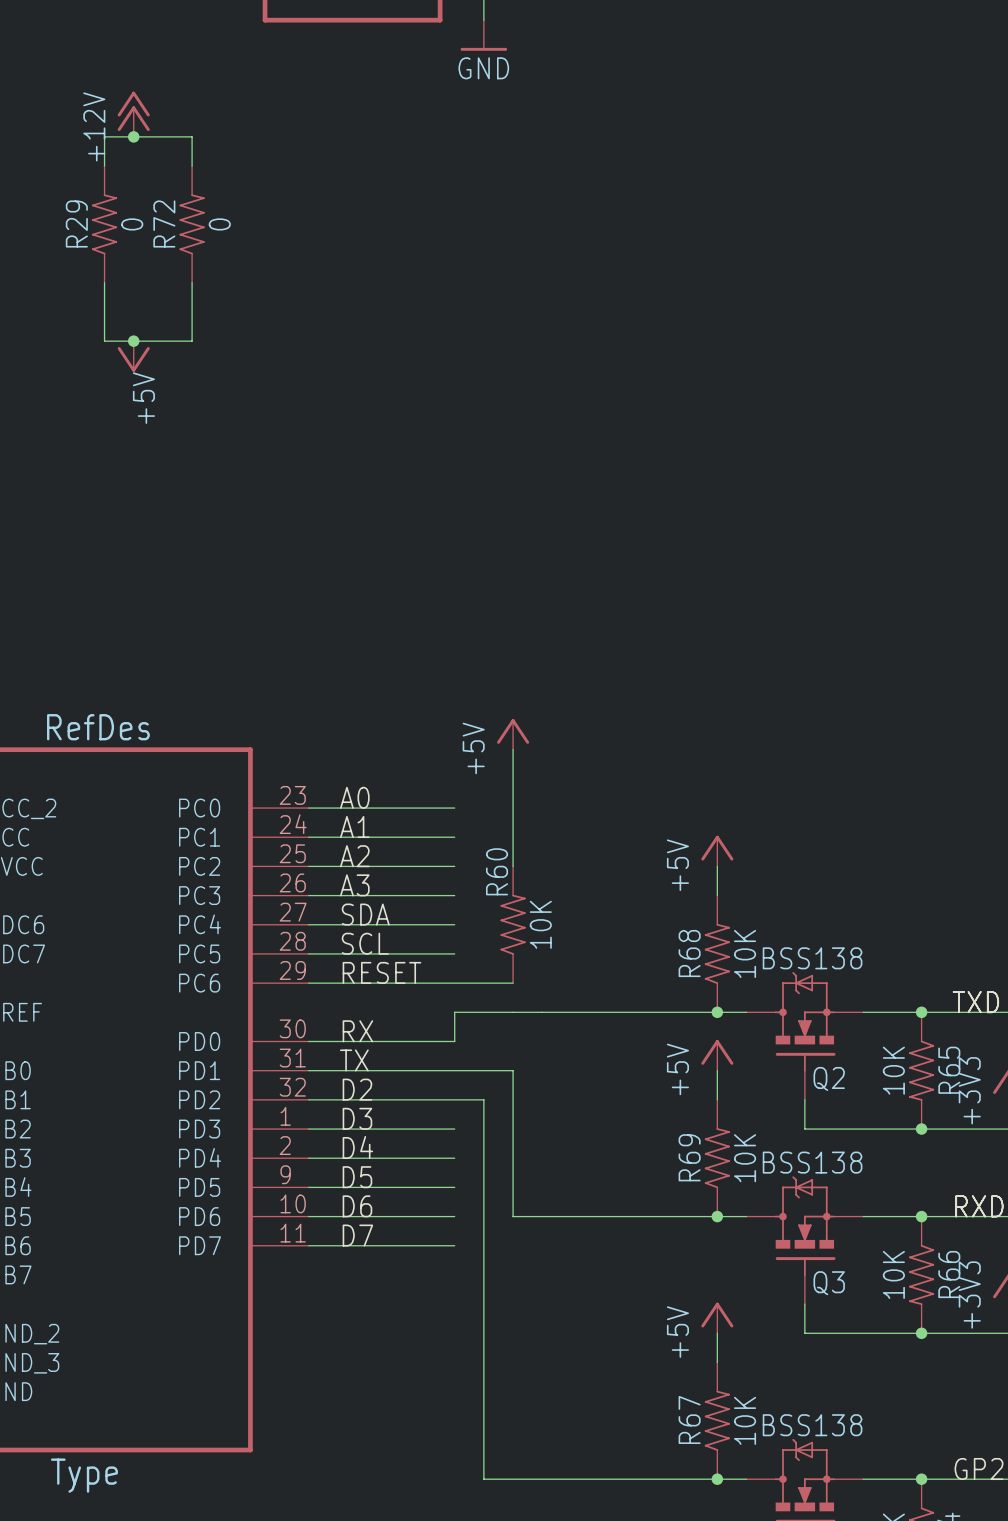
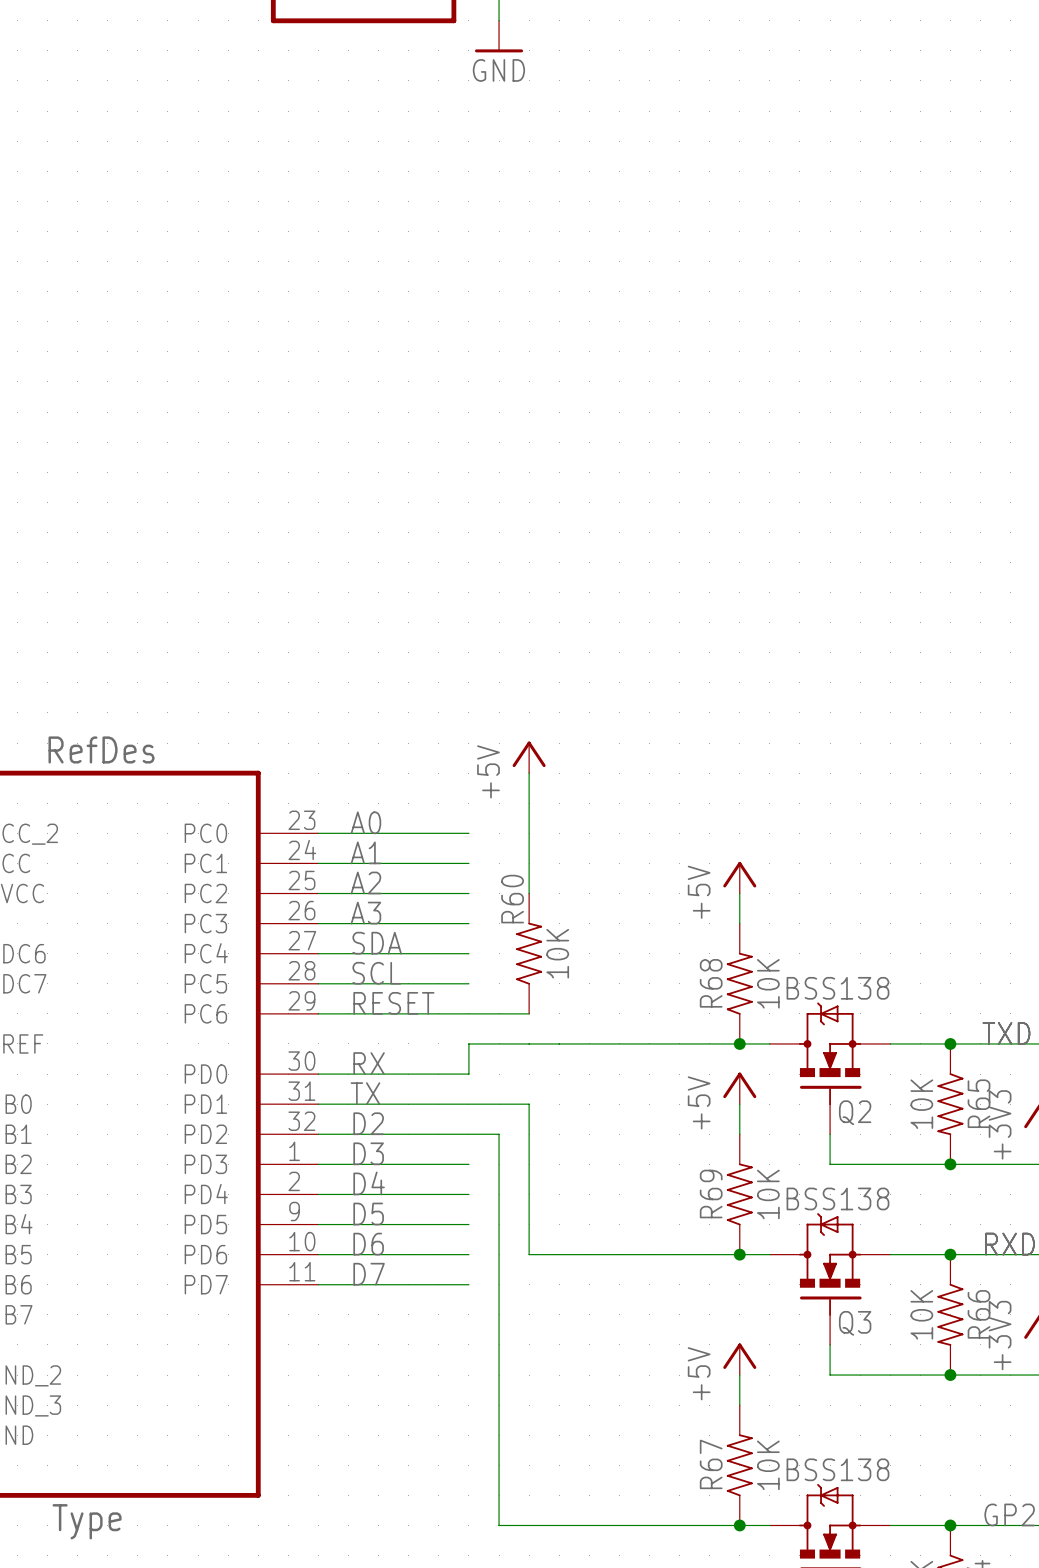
power symbol: +12V (133, 114) -> none
junction: (133, 136) -> none
wire: (104, 166) (104, 136) (192, 136) (192, 166) -> none
R29: 0 (104, 224) -> none
R72: 0 (192, 224) -> none
wire: (104, 282) (104, 341) (192, 341) (192, 282) -> none
junction: (133, 341) -> none
power symbol: +5V (133, 356) -> none

